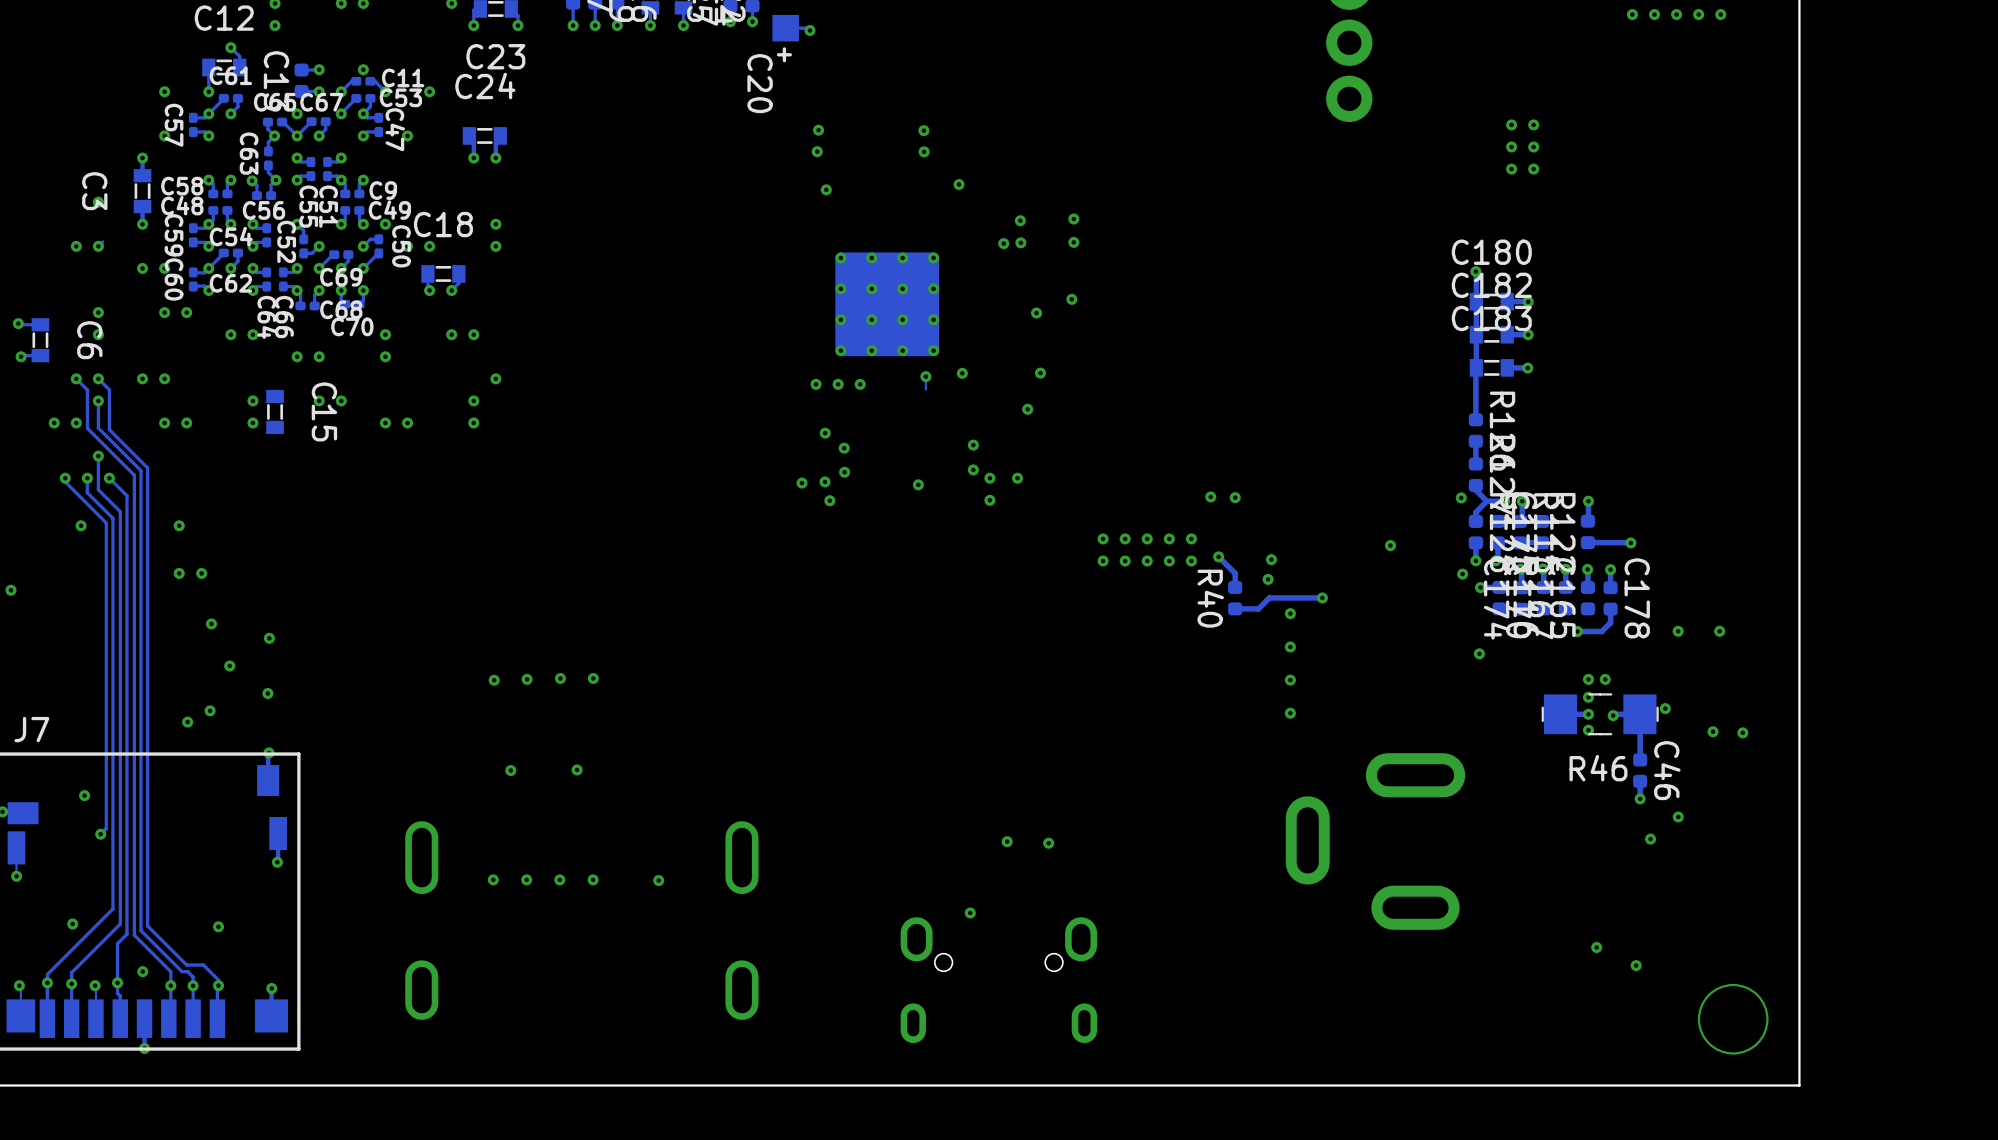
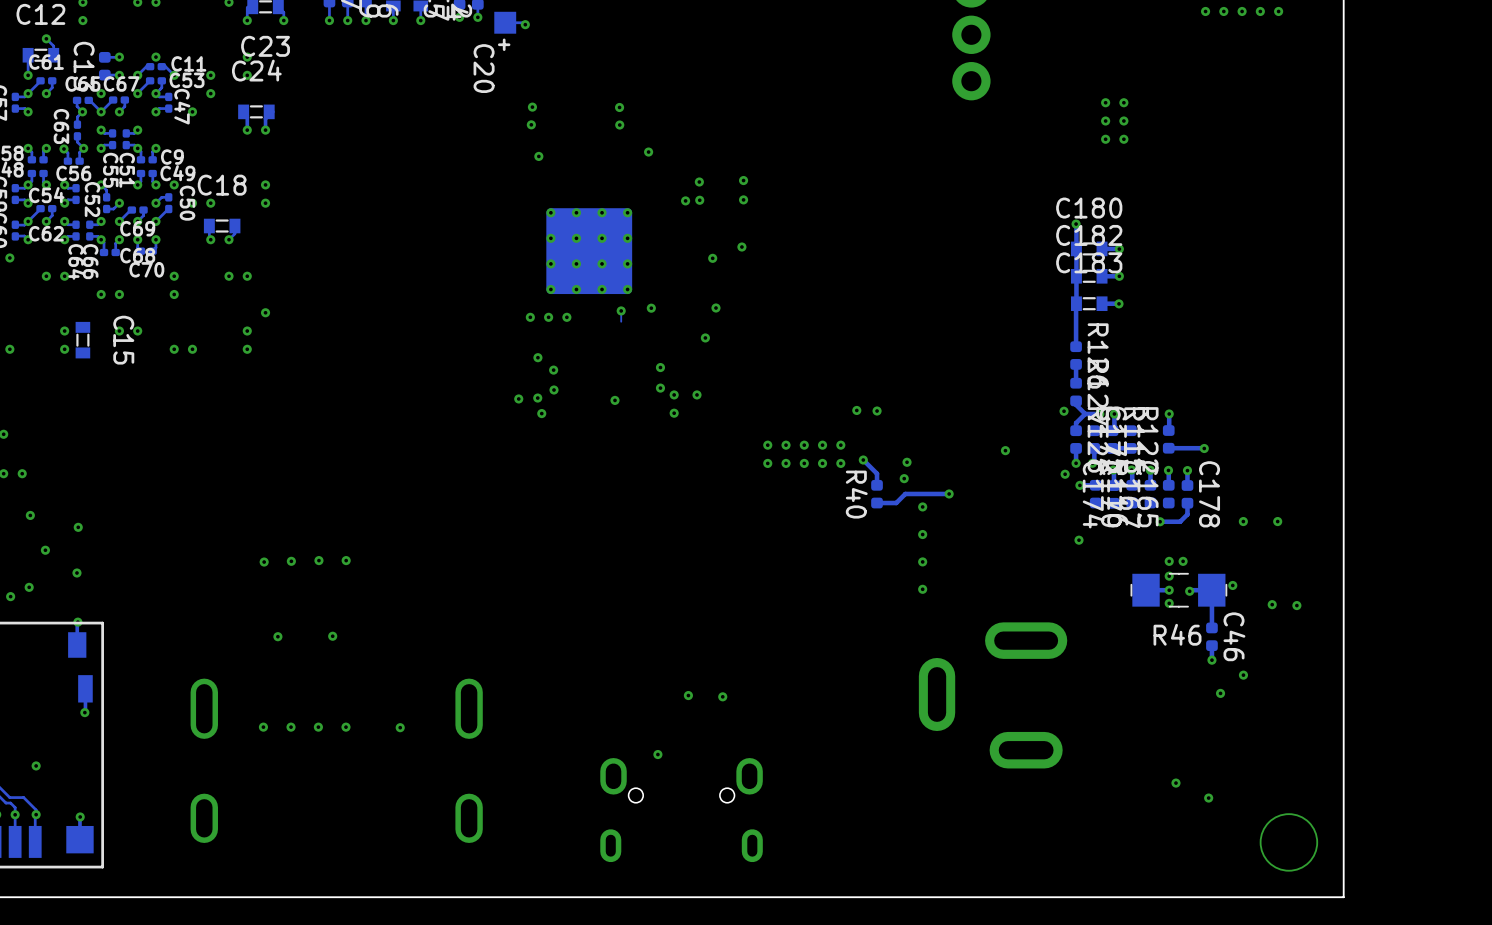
via: none -> (247, 57)
via: none -> (247, 75)
via: none -> (210, 93)

